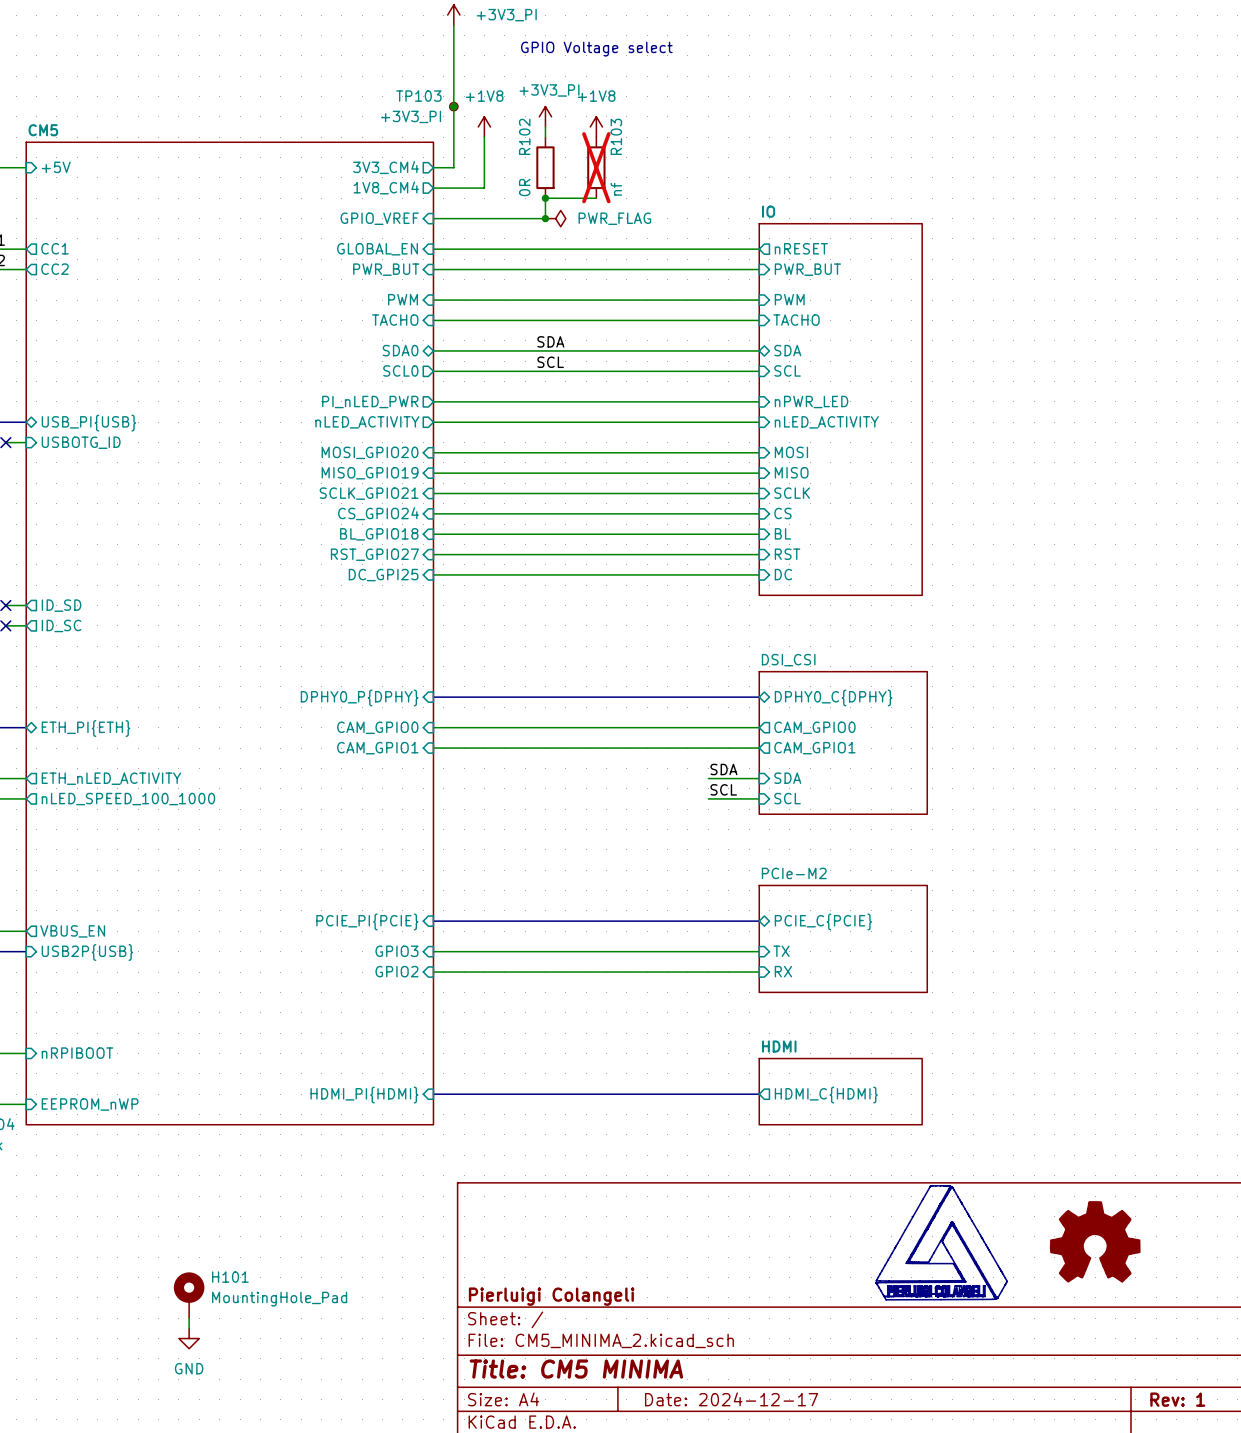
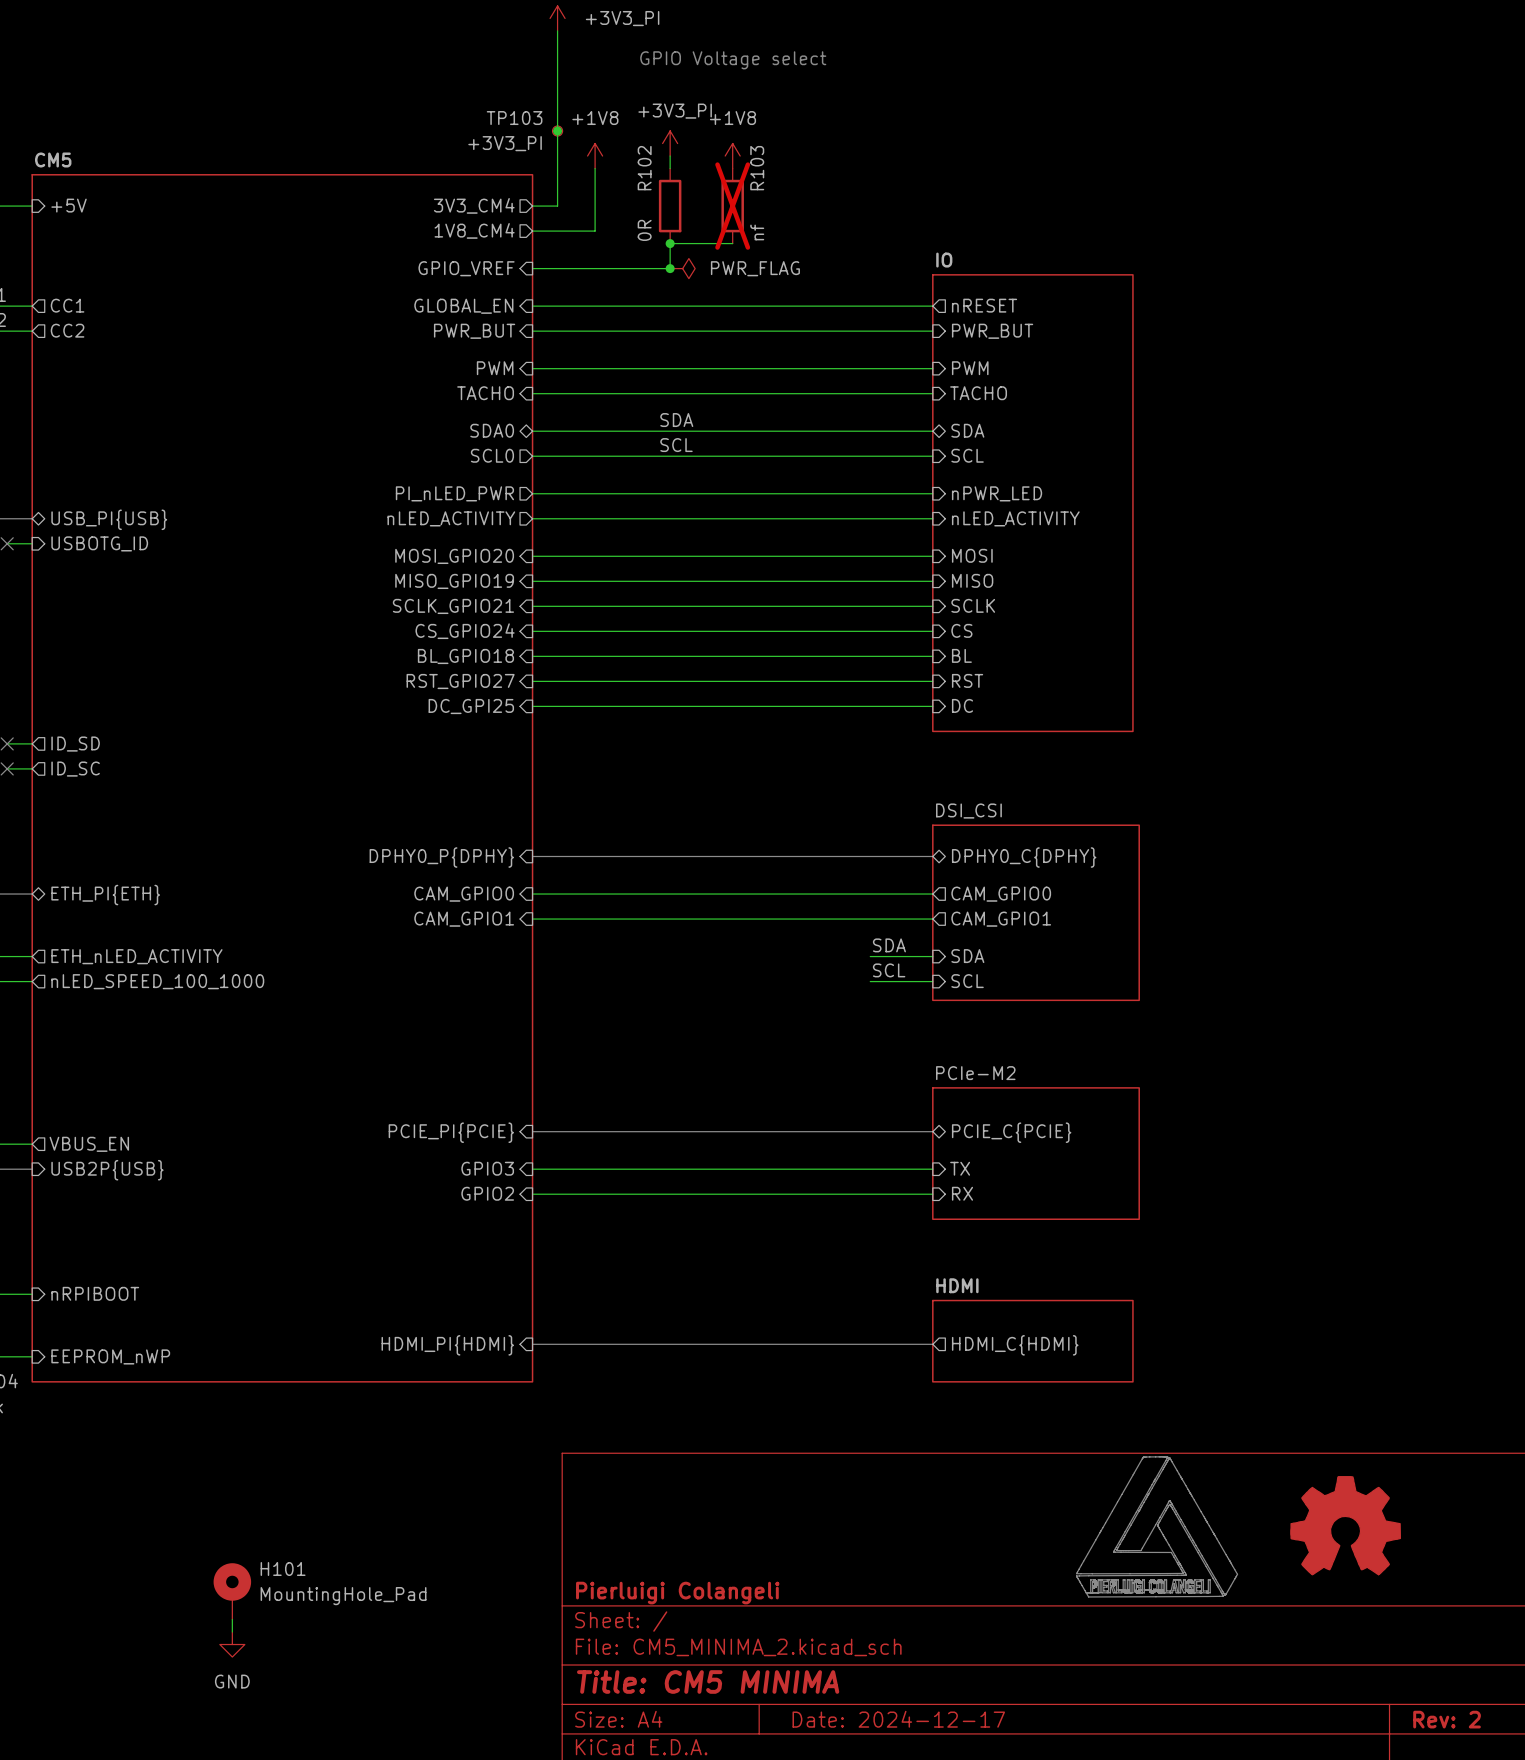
title block: Rev: 1 (1177, 1399) -> Rev: 2 (1447, 1719)

